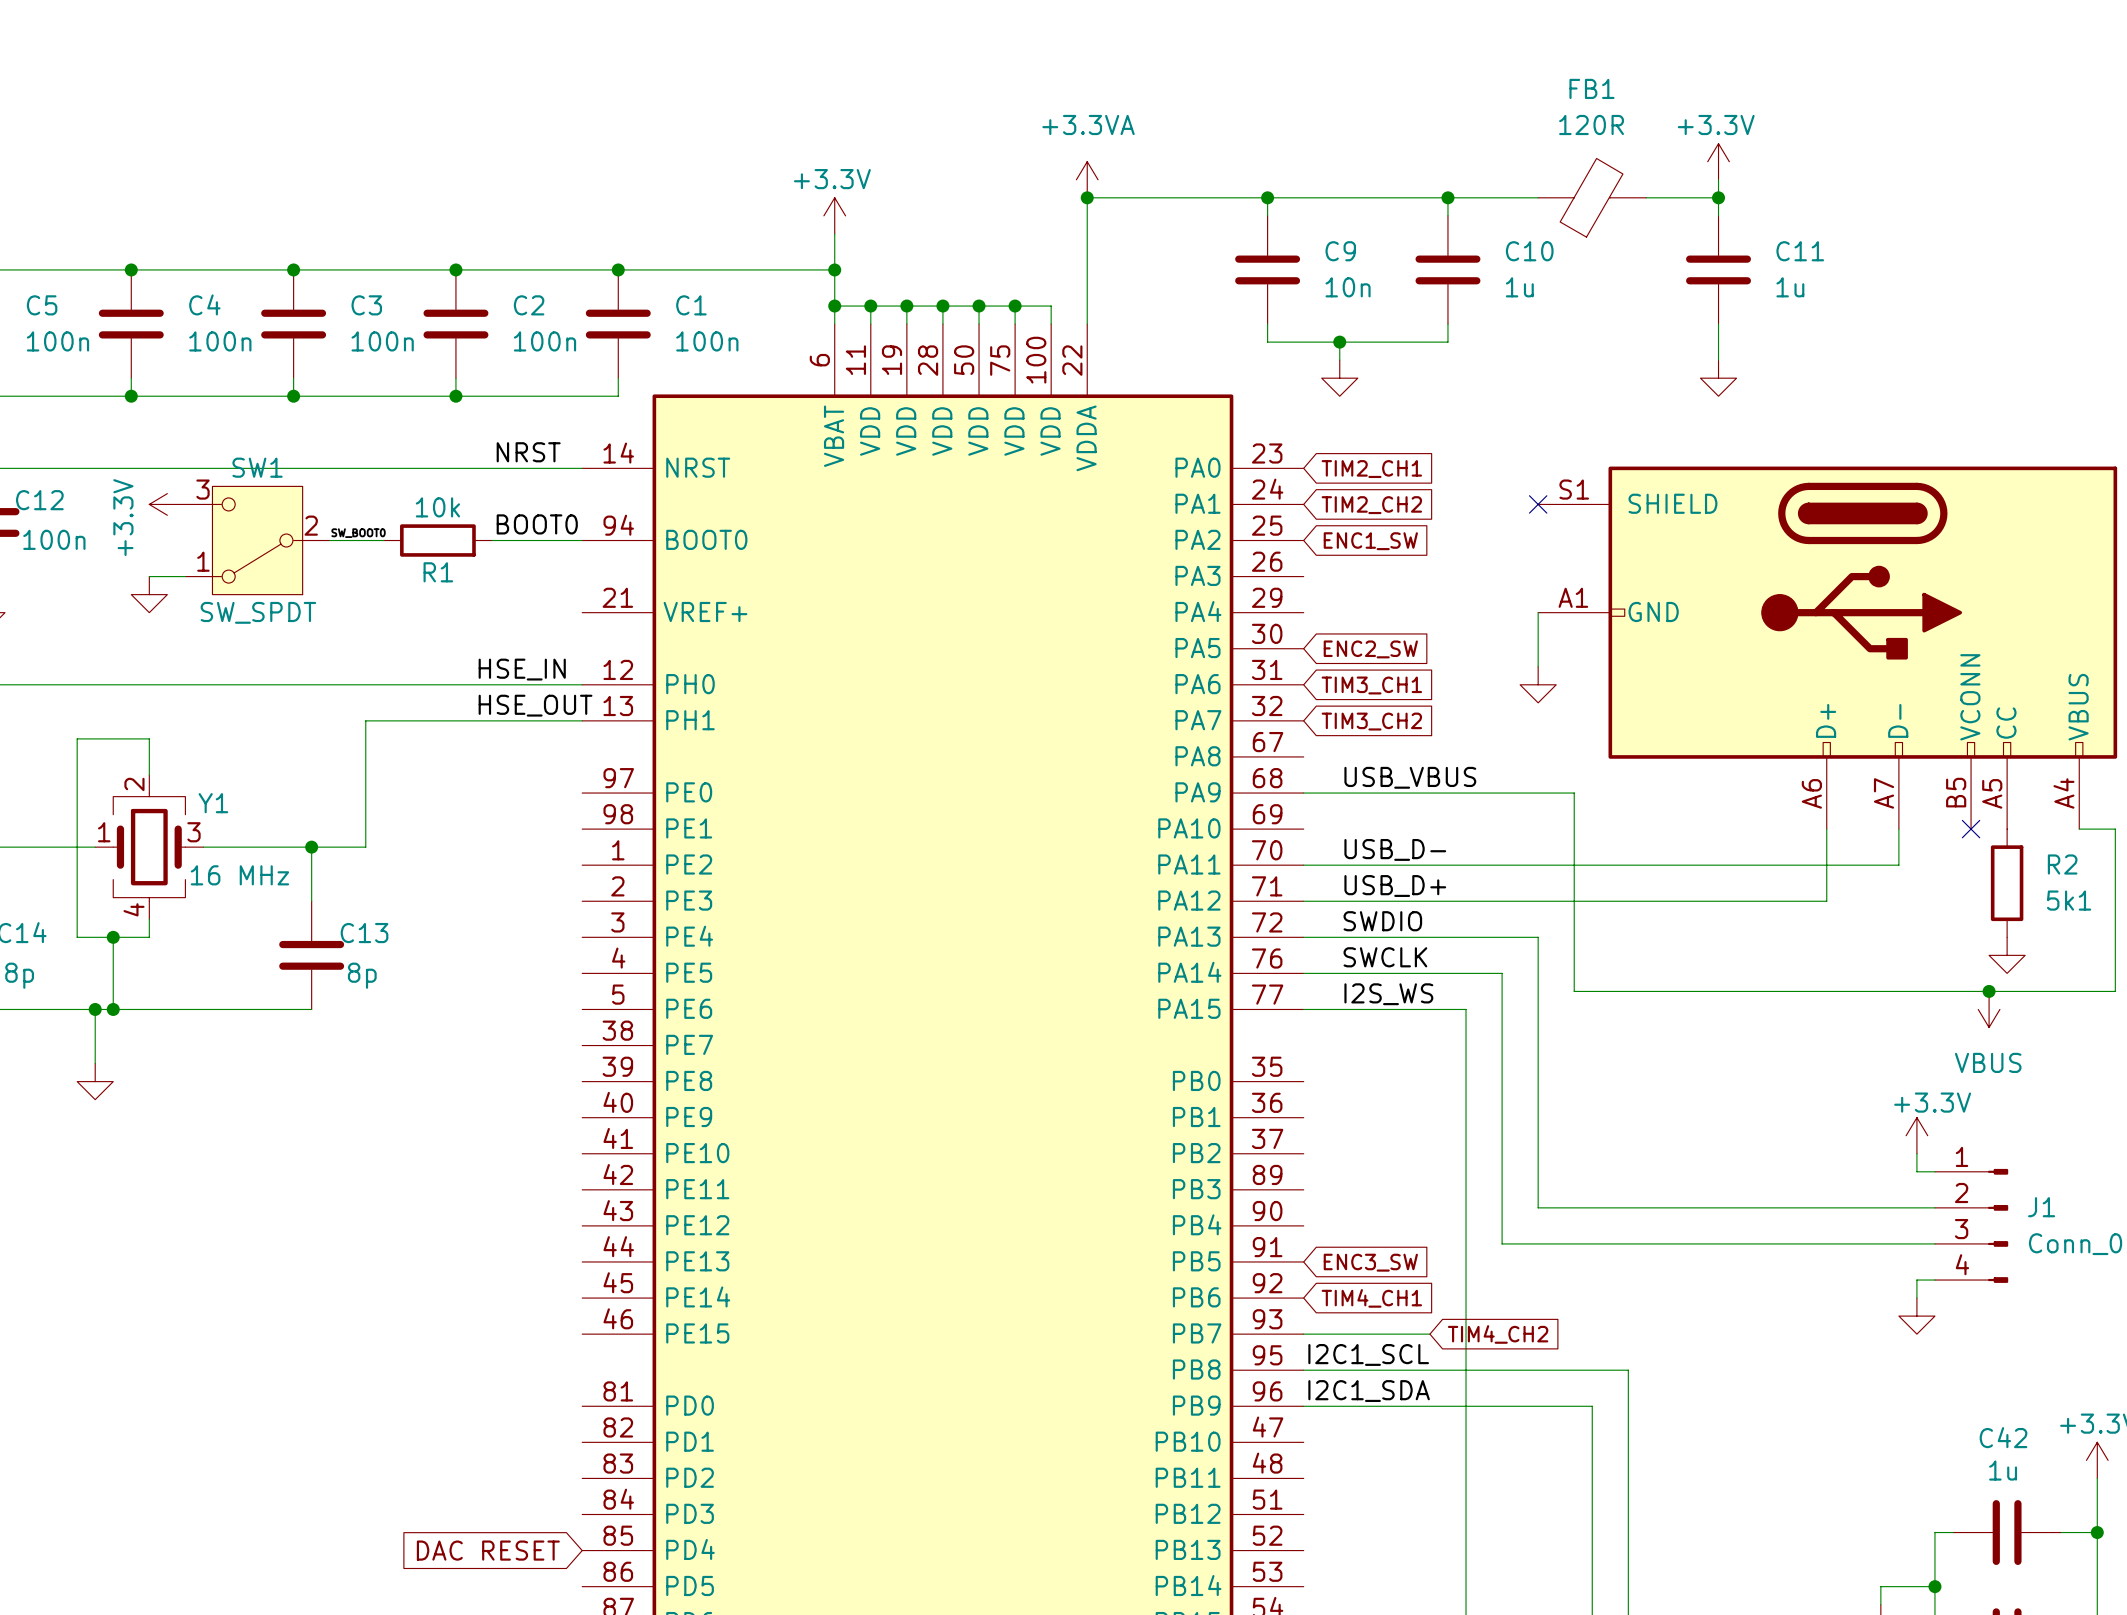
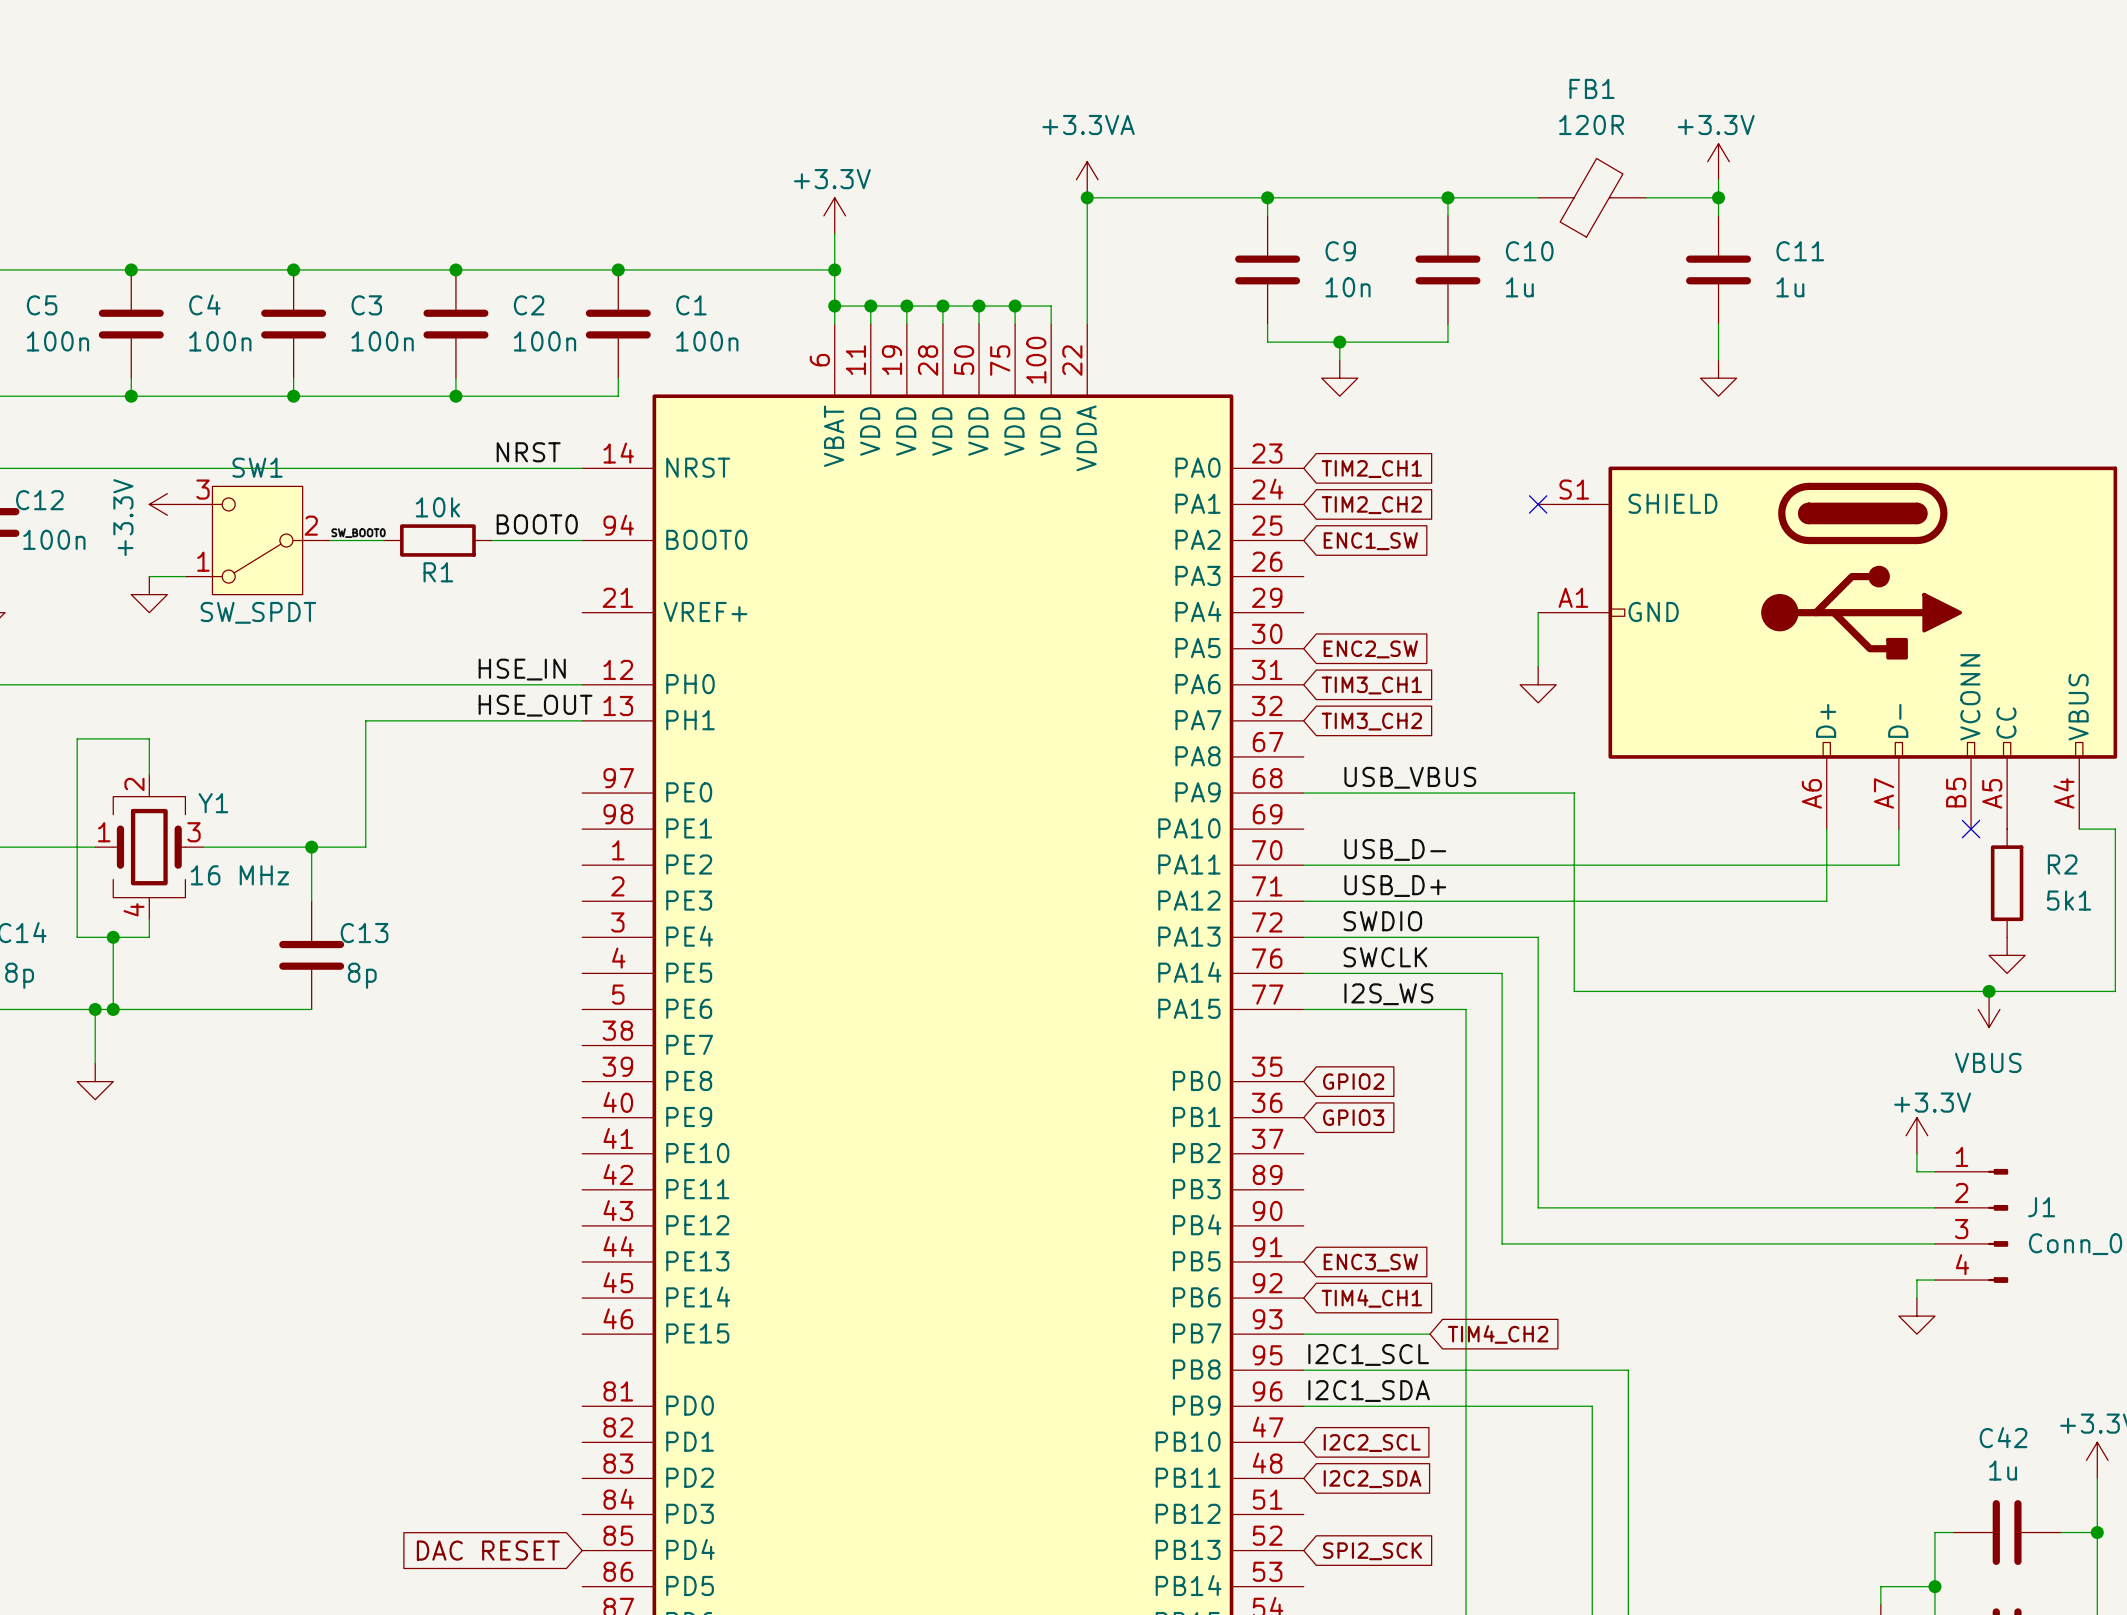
global label: none -> GPIO2 (1353, 1081)
global label: none -> GPIO3 (1353, 1117)
global label: none -> I2C2_SCL (1372, 1443)
global label: none -> I2C2_SDA (1372, 1479)
global label: none -> SPI2_SCK (1372, 1551)

